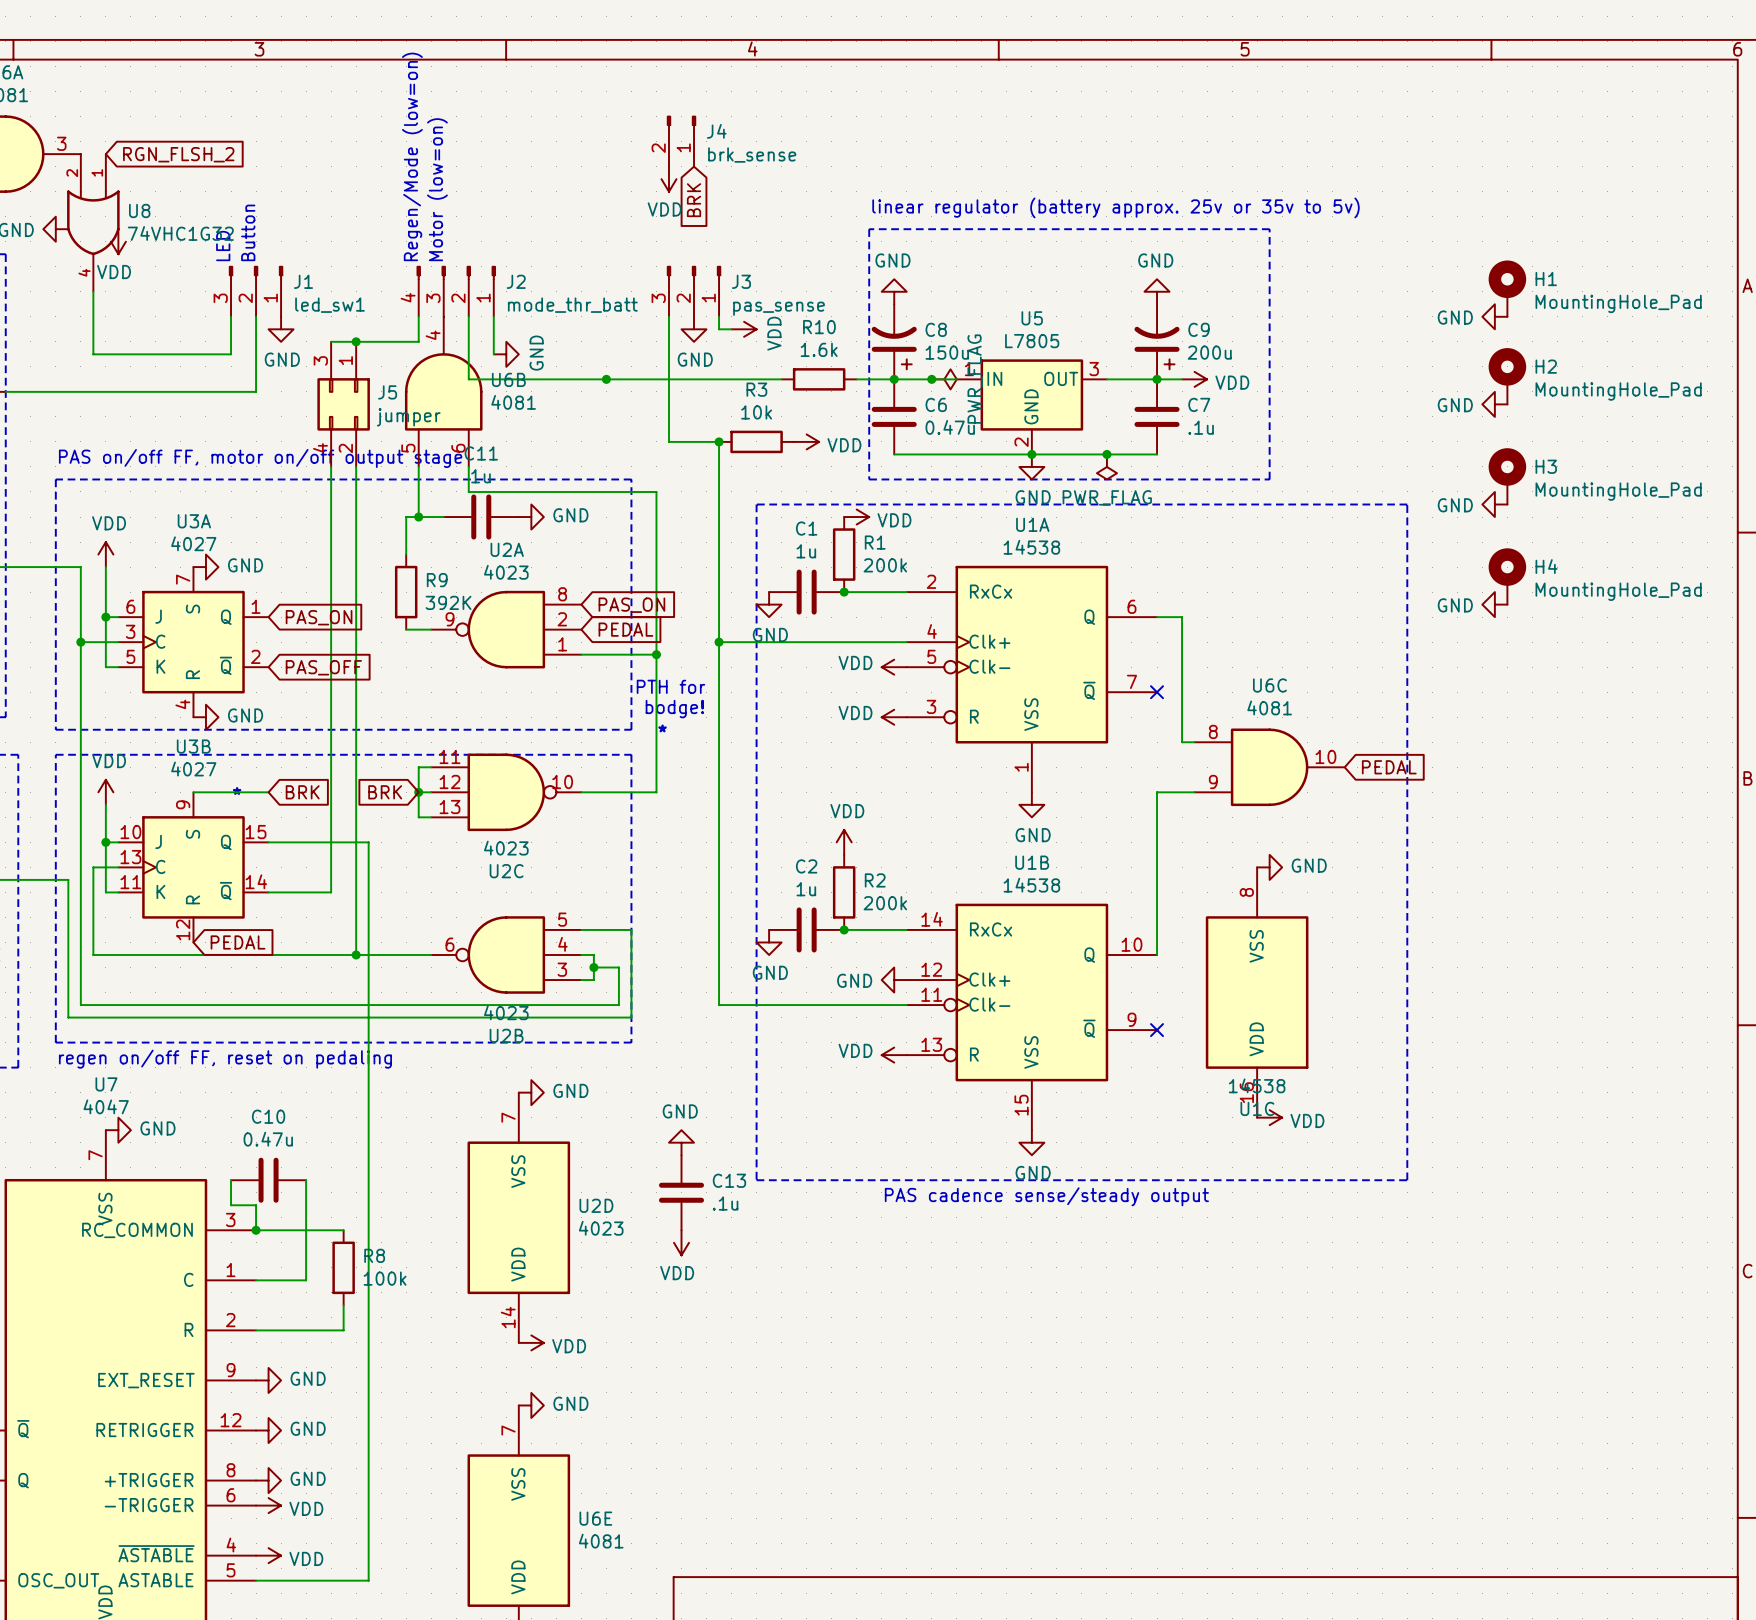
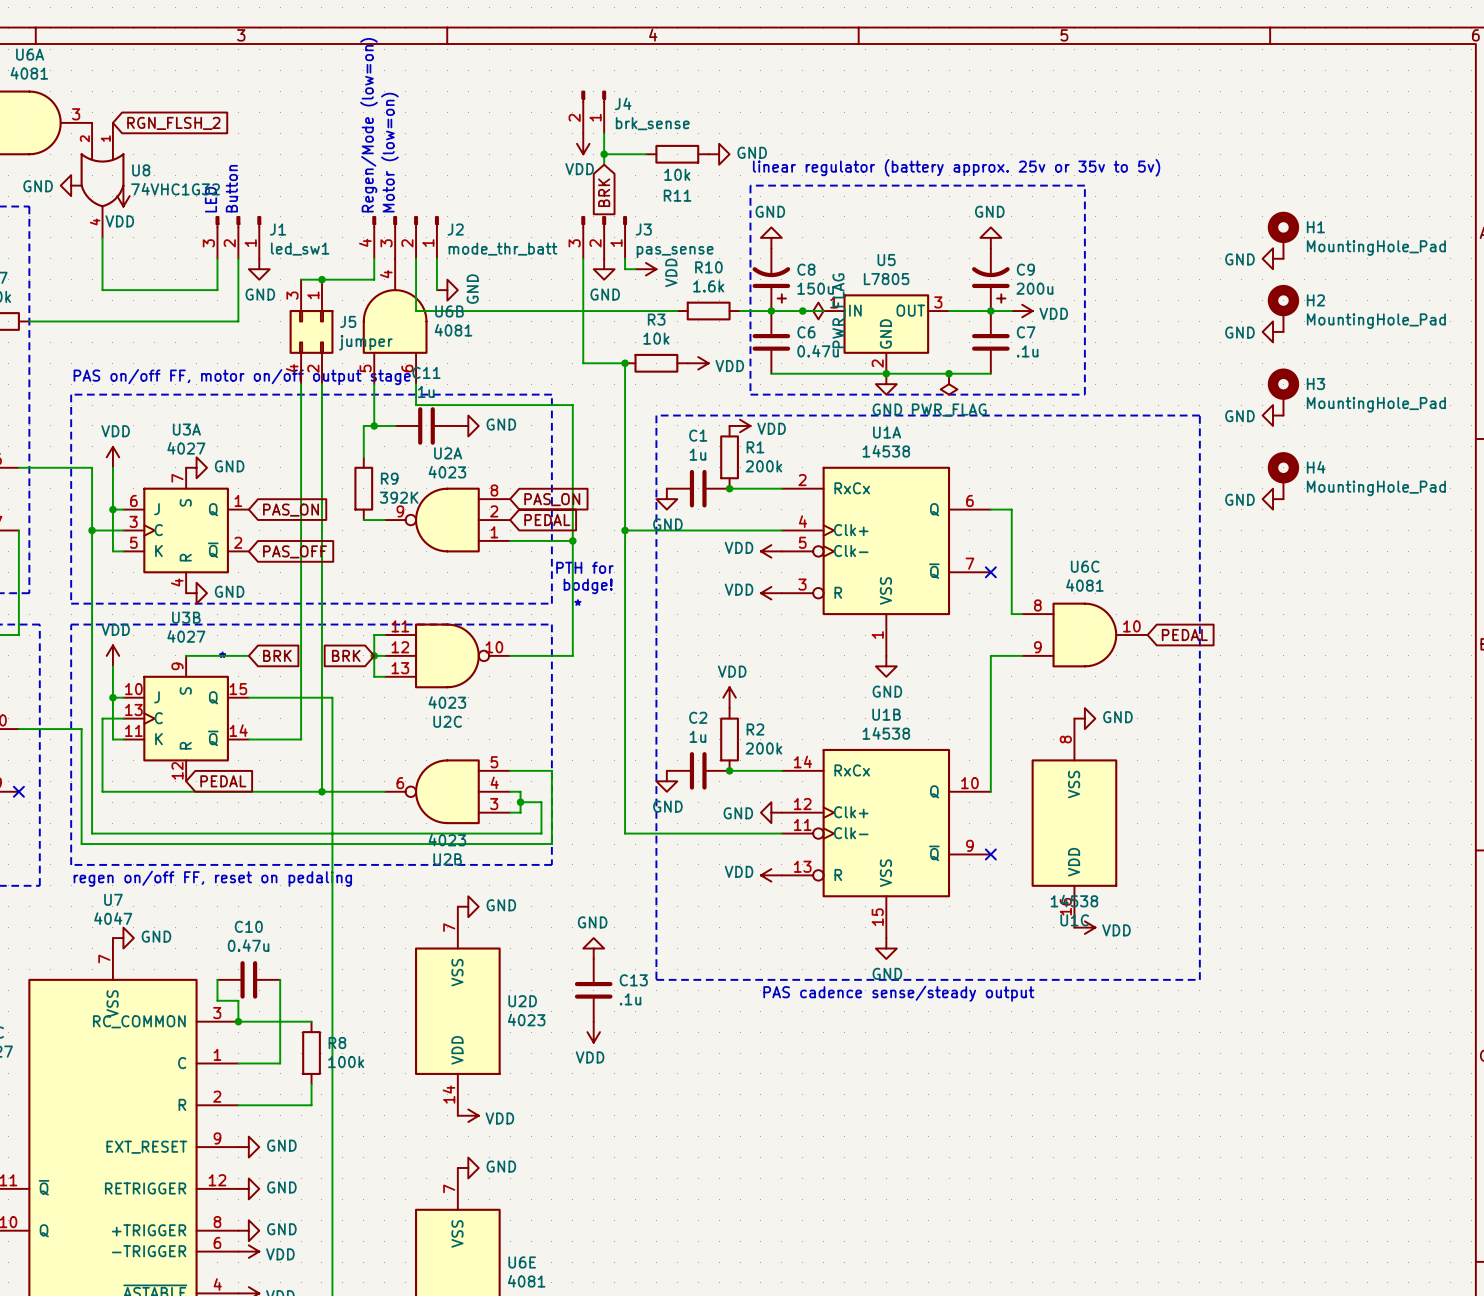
wire: none -> (604, 133) (604, 164)
wire: none -> (604, 154) (645, 154)
junction: none -> (604, 154)
R11: none -> 10k (677, 154)
power symbol: none -> GND (719, 154)
global label position: BRK (694, 200) -> BRK (604, 192)
junction: (606, 379) -> none

